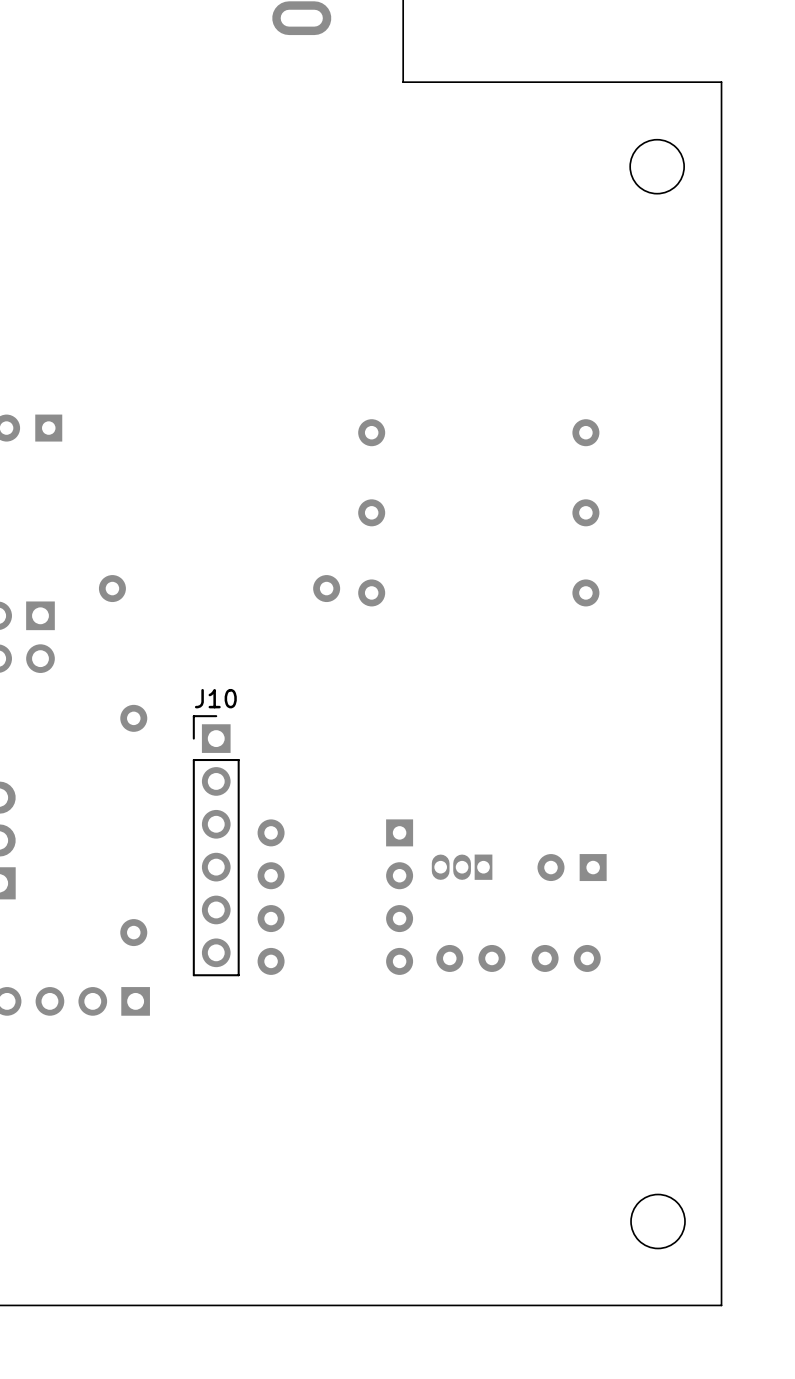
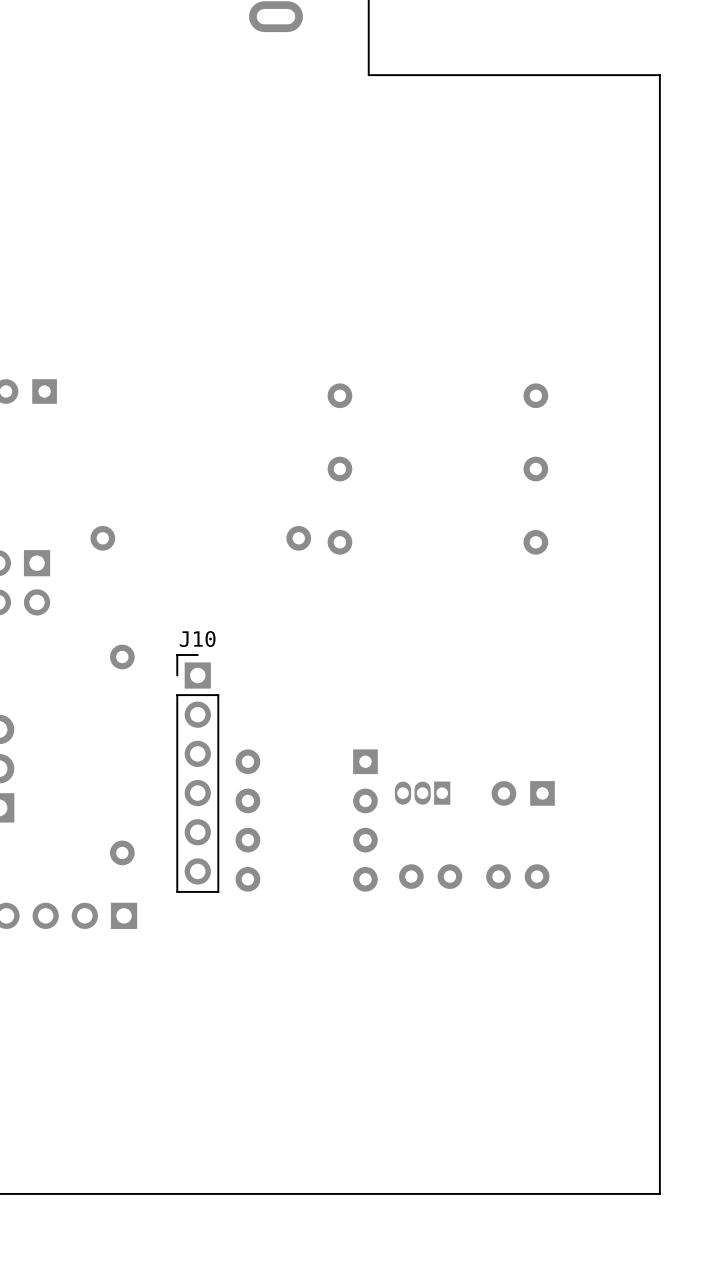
round board edge: [629, 139, 685, 195] -> none
round board edge: [630, 1194, 686, 1249] -> none

